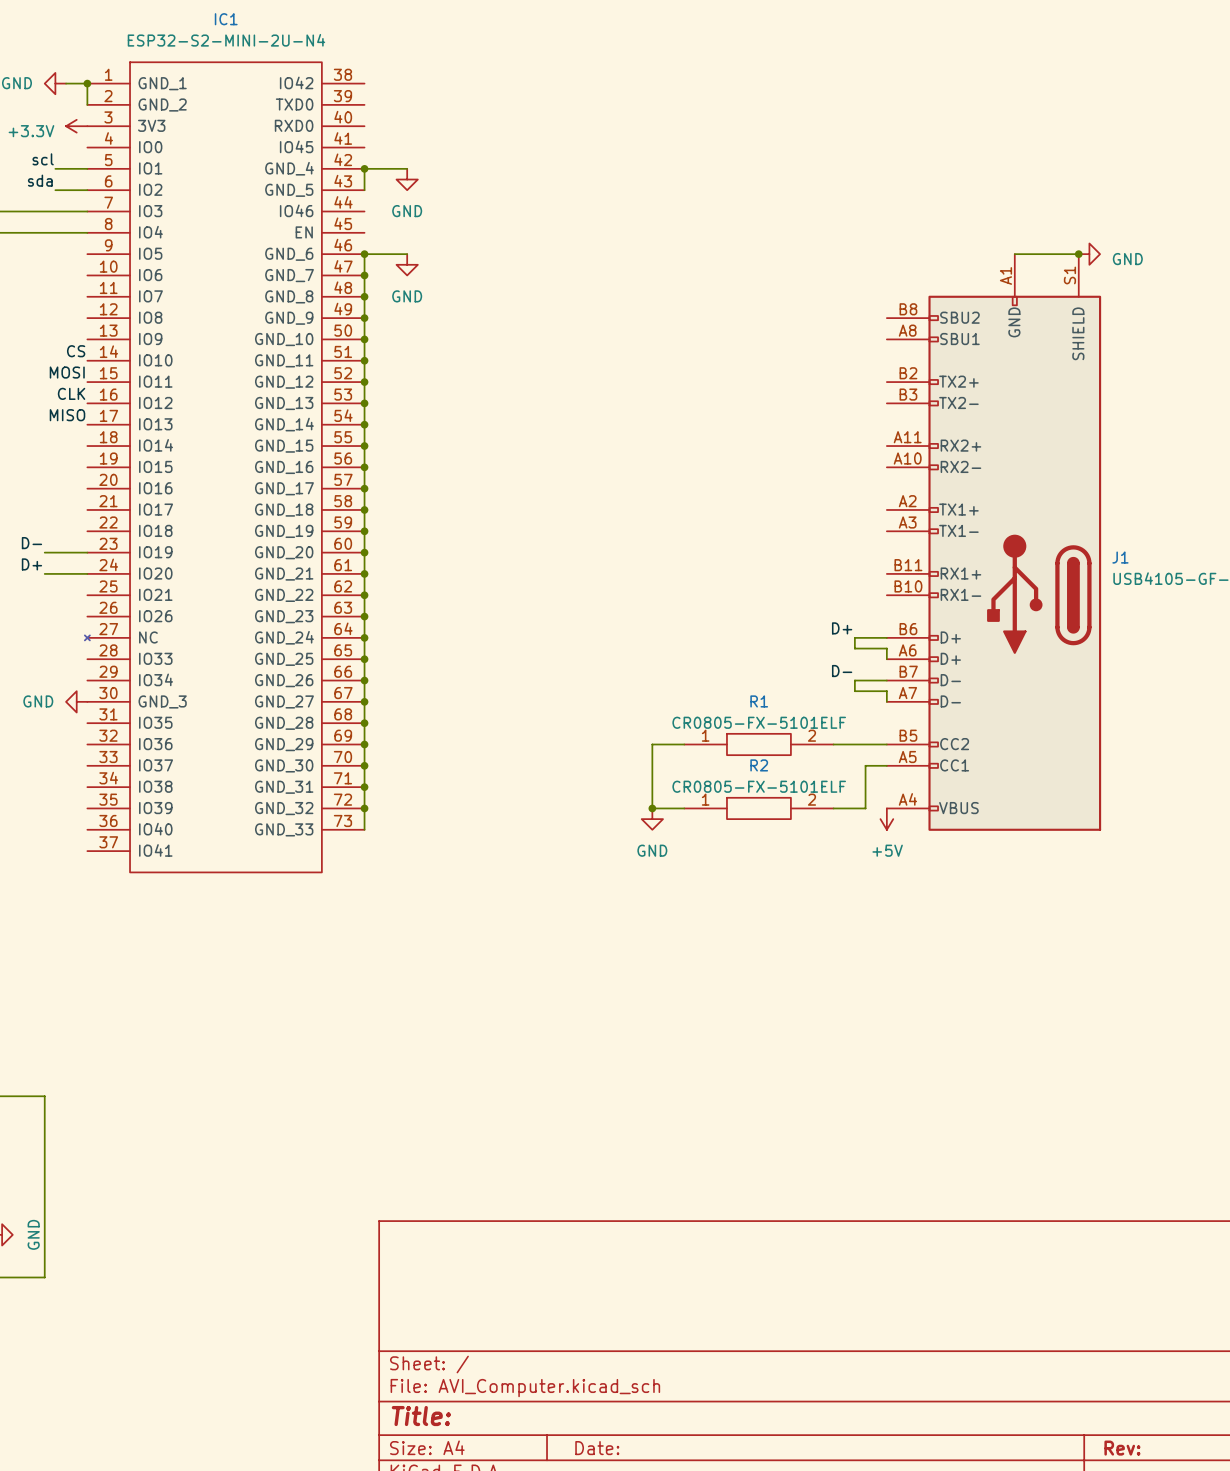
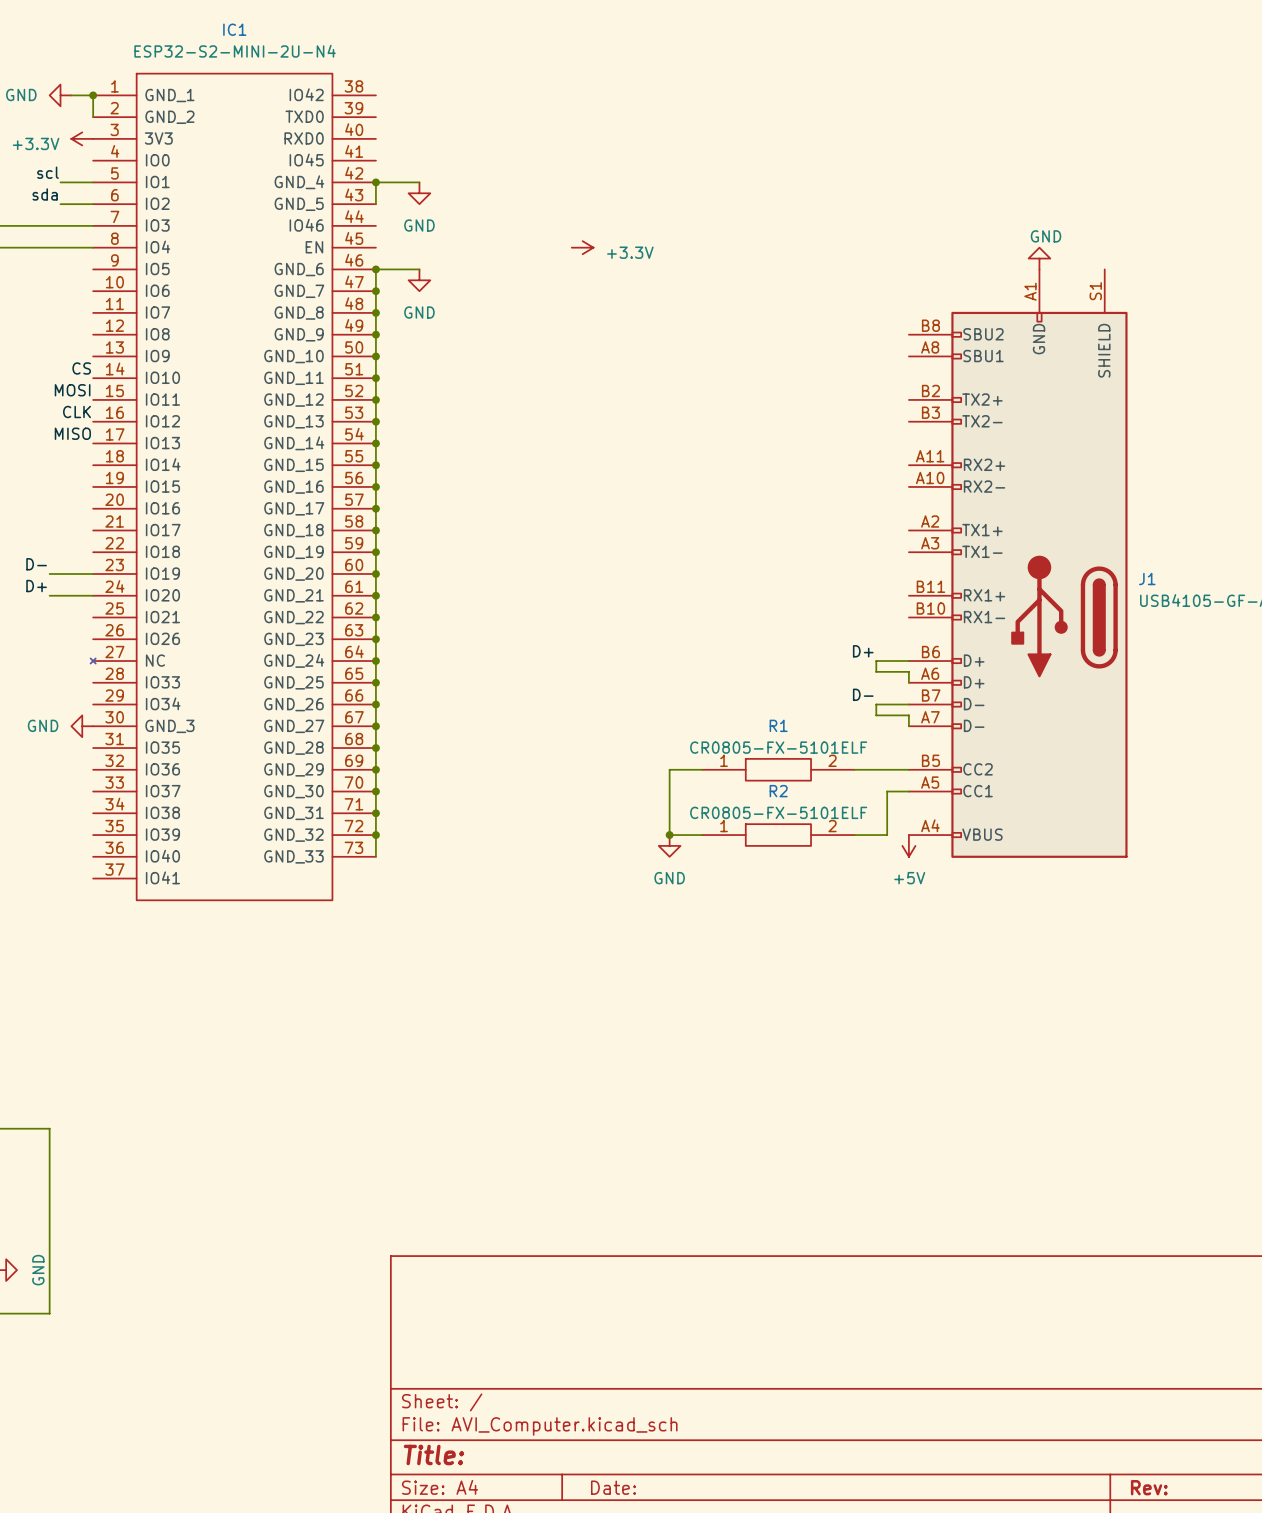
power symbol: none -> +3.3V (582, 247)
wire: (1014, 254) (1078, 254) -> none
junction: (1078, 254) -> none
power symbol rotation: 0° (1089, 254) -> 90° counterclockwise (1039, 258)
power symbol position: GND (1089, 254) -> GND (1039, 258)
power symbol text position: GND (1127, 259) -> GND (1046, 236)

